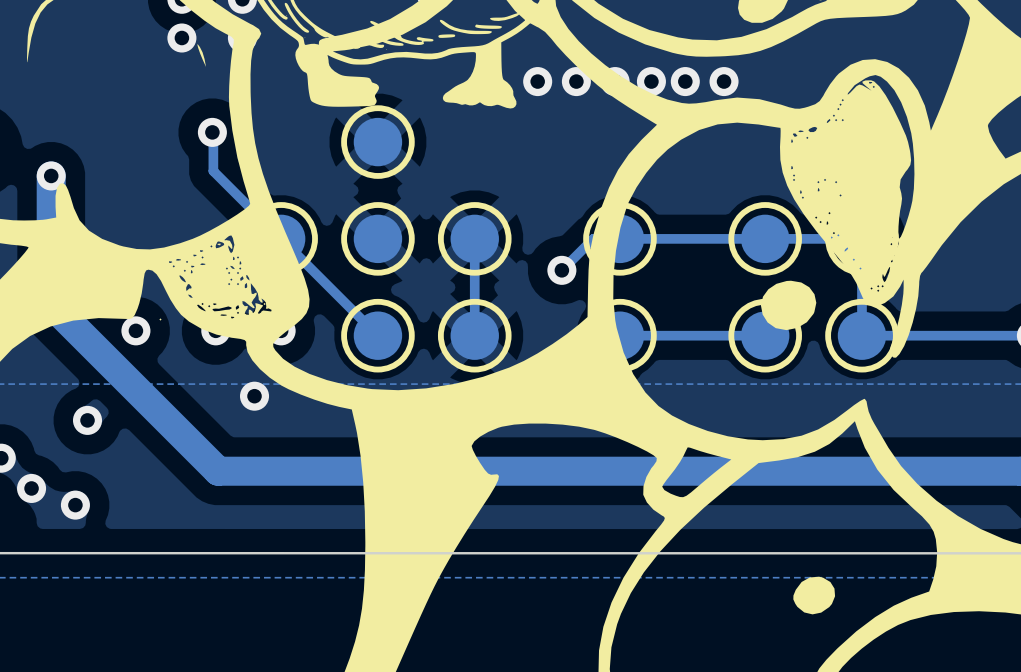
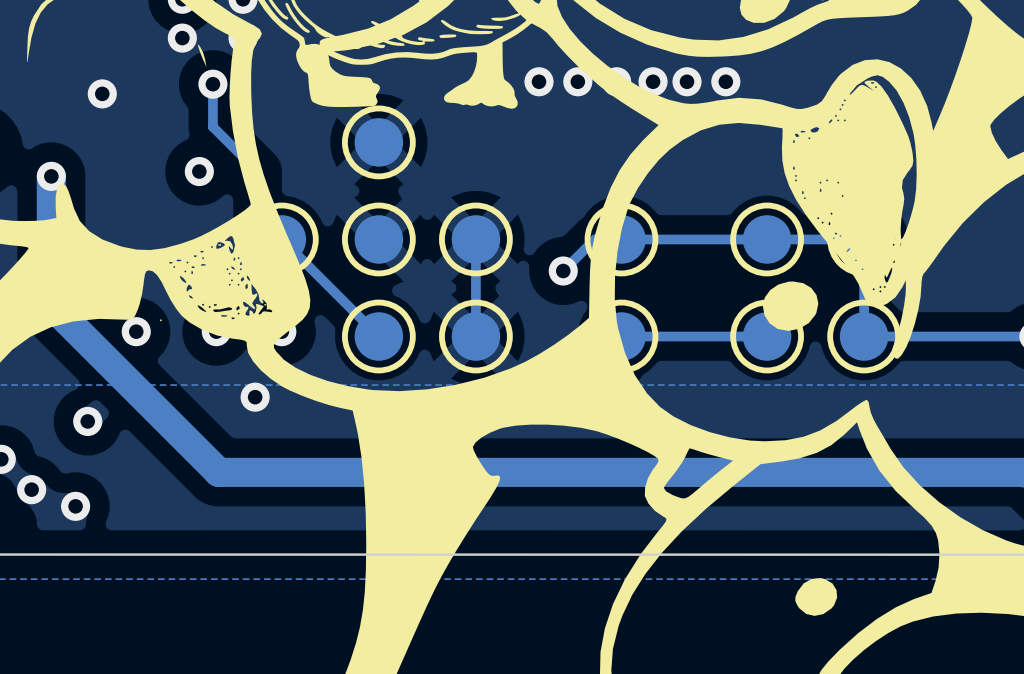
via: none -> (212, 84)
via: none -> (102, 93)
track: (212, 132) (213, 171) (256, 214) -> (212, 84) (212, 126) (257, 171) (257, 215)
via: (212, 132) -> none
via: none -> (199, 171)

